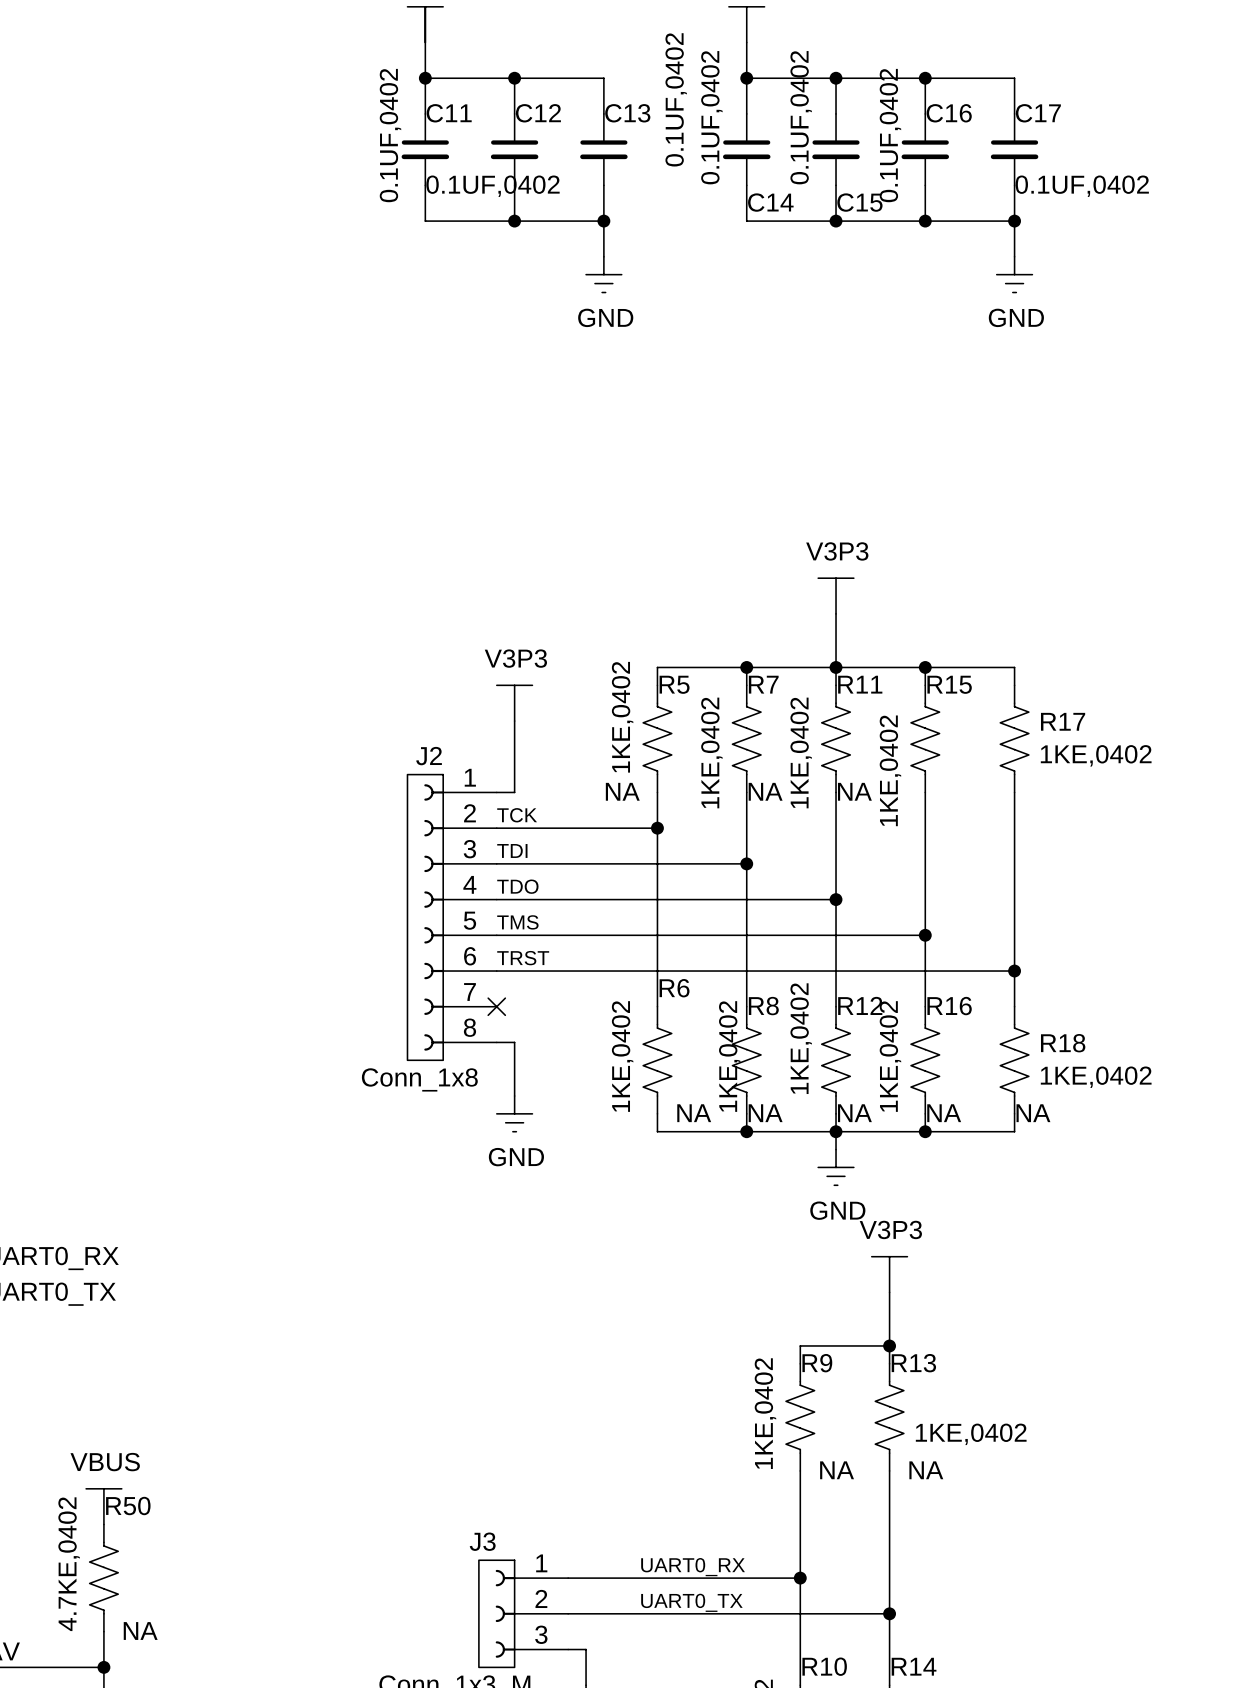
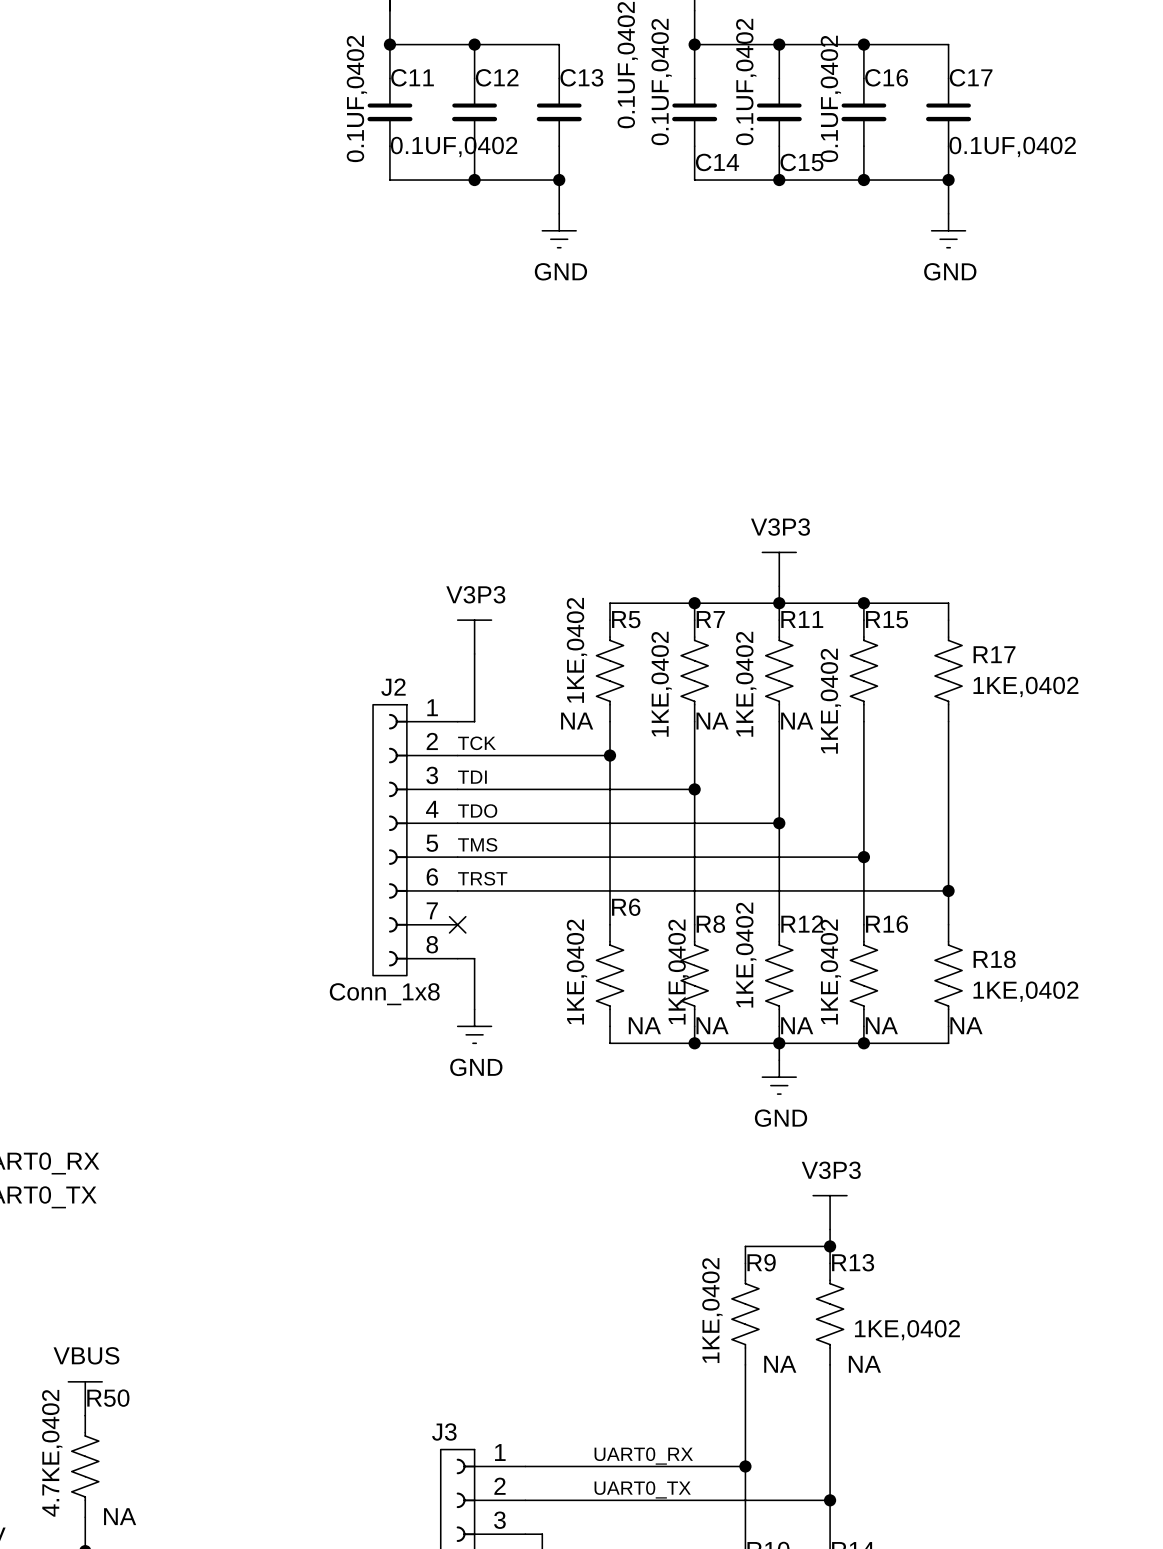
power symbol position: V3P3 (836, 596) -> V3P3 (779, 569)
power symbol position: V3P3 (889, 1274) -> V3P3 (830, 1212)
power symbol shape: [86, 1488, 122, 1525] -> [68, 1381, 103, 1416]

